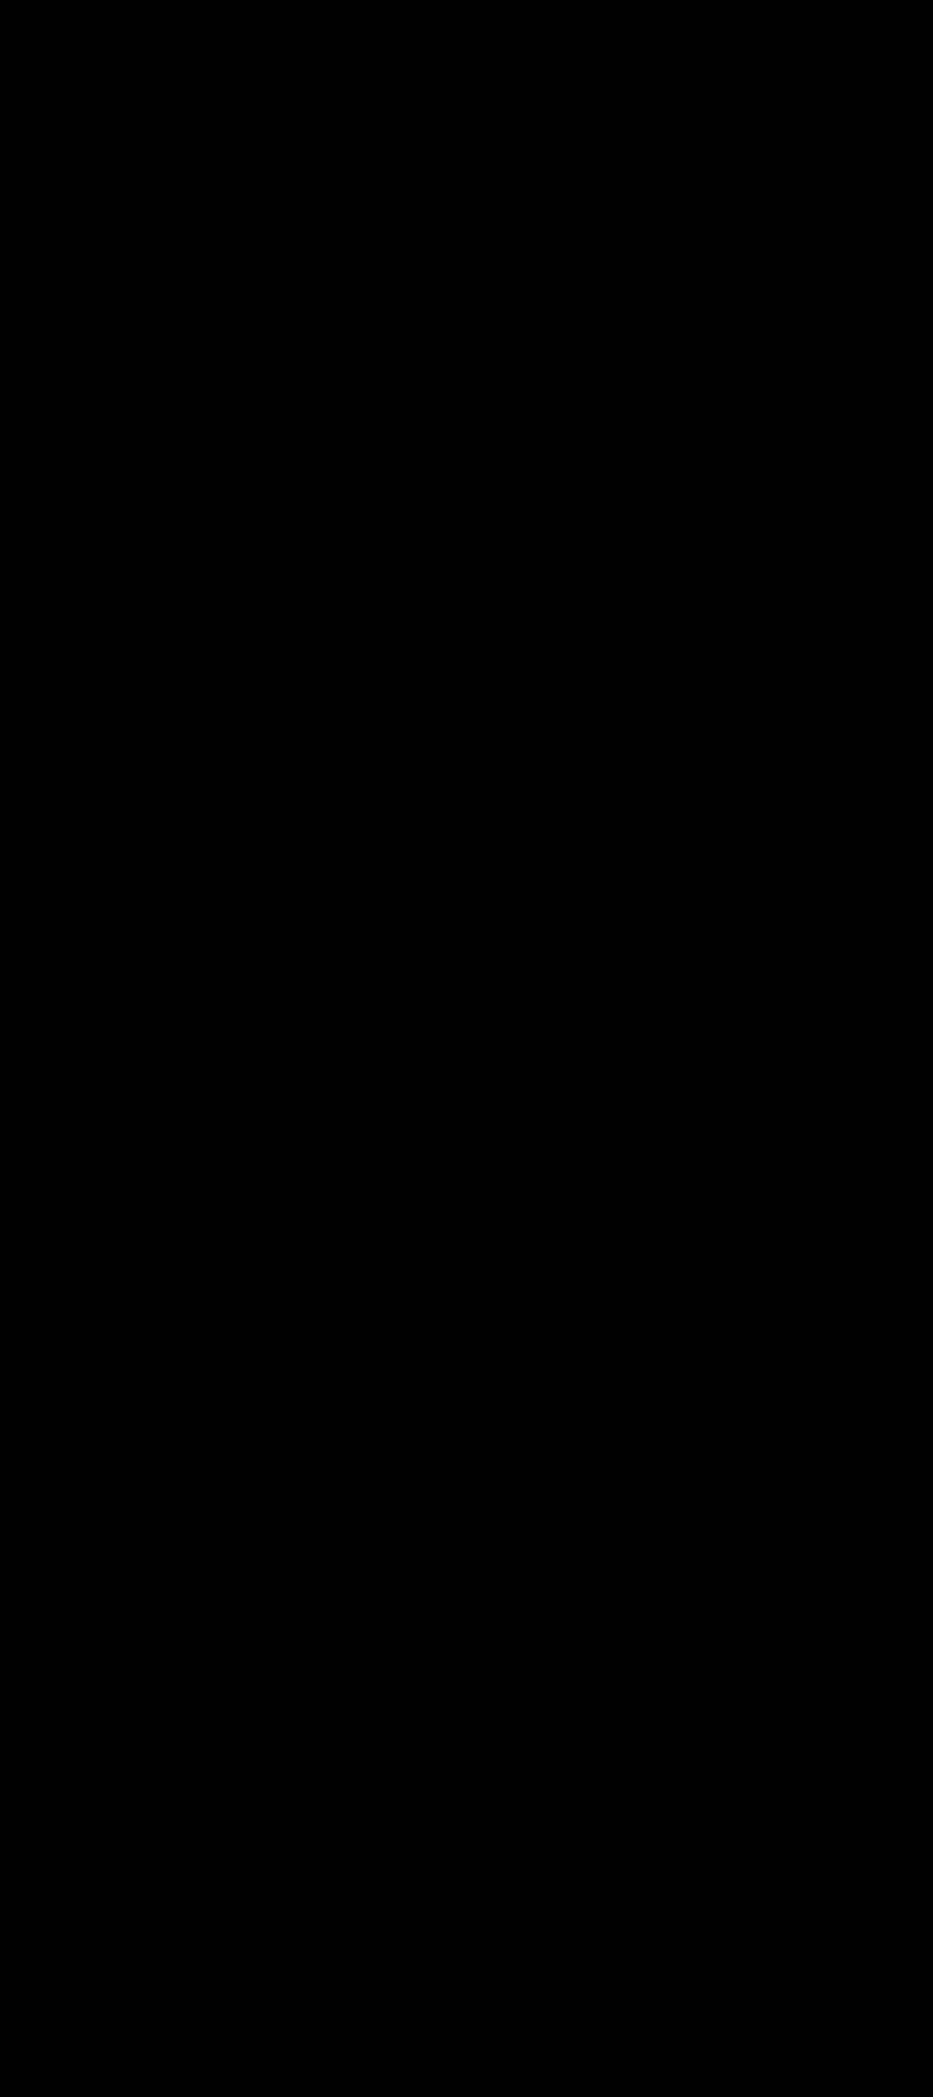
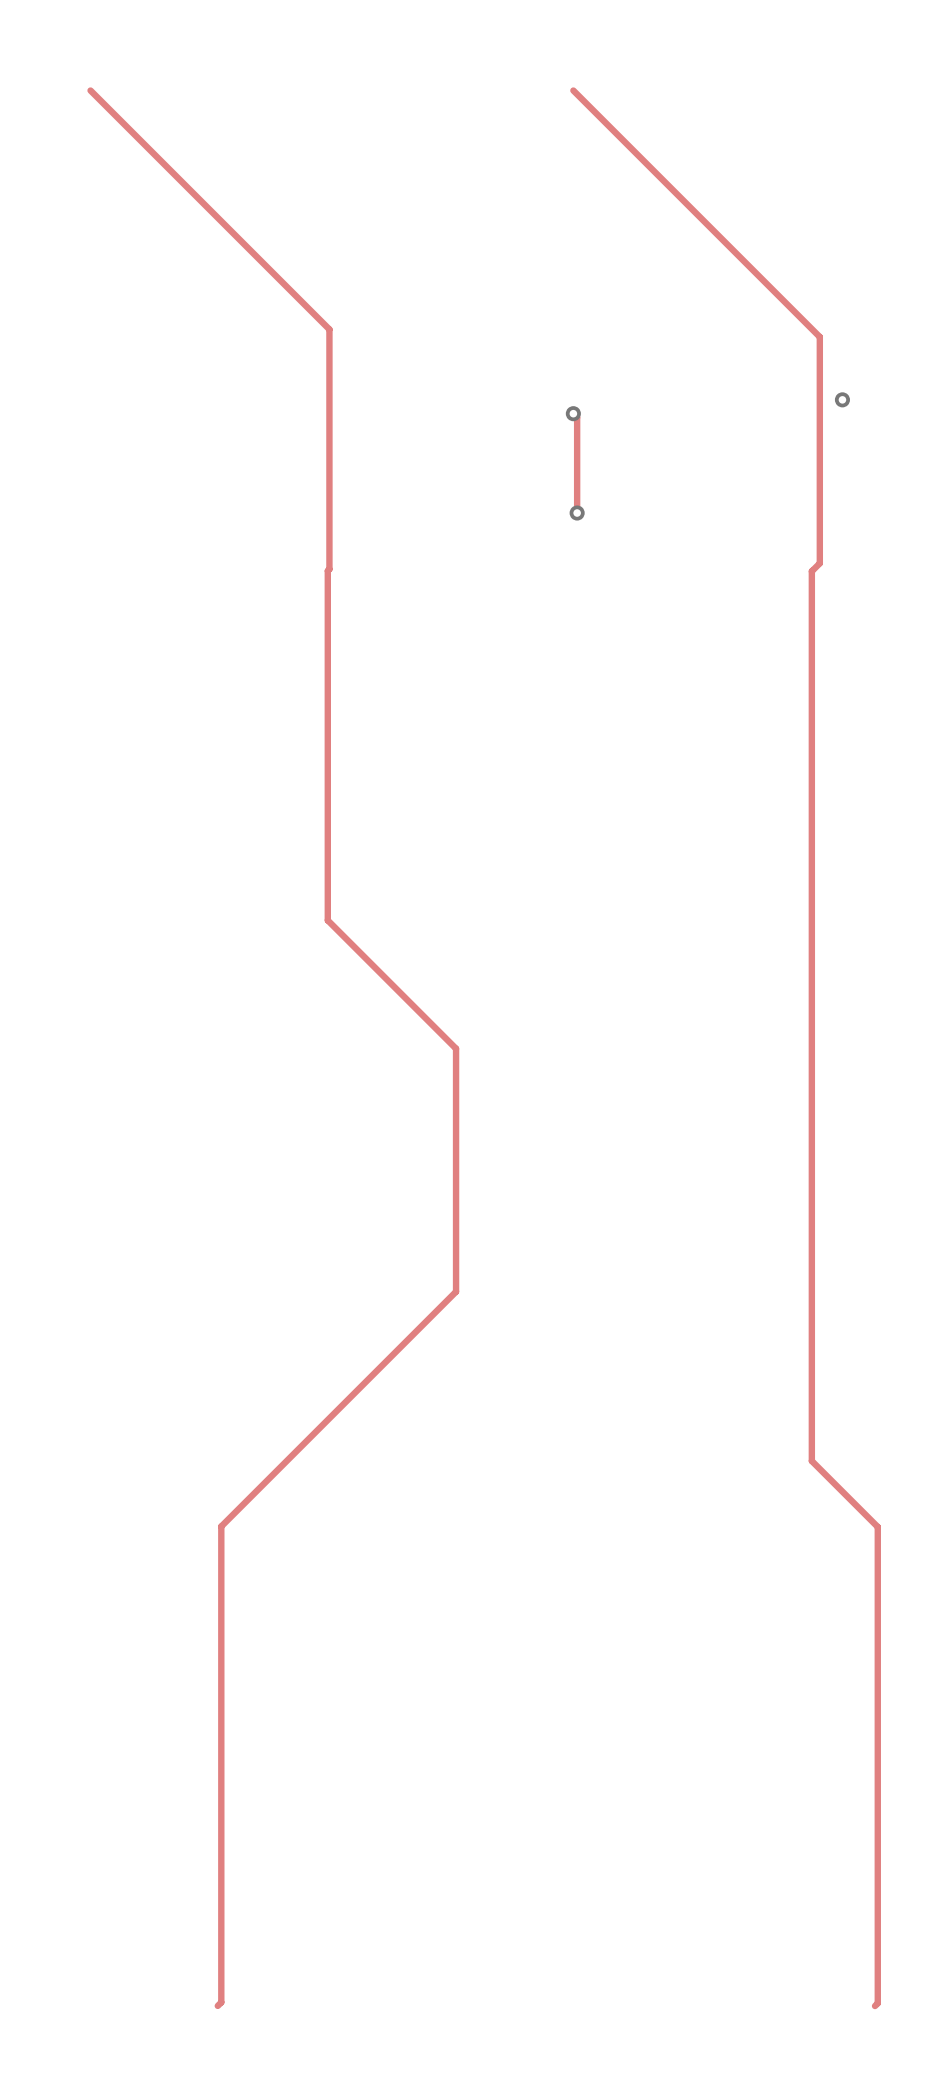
track: none -> (90, 90) (329, 329) (327, 920) (456, 1048) (456, 1291) (221, 1526) (221, 2002) (217, 2005)
track: none -> (573, 90) (819, 336) (819, 563) (811, 571) (811, 1461) (877, 1526) (877, 2003) (875, 2006)
via: none -> (842, 399)
track: none -> (573, 413) (577, 417) (577, 513)
via: none -> (573, 413)
via: none -> (577, 513)

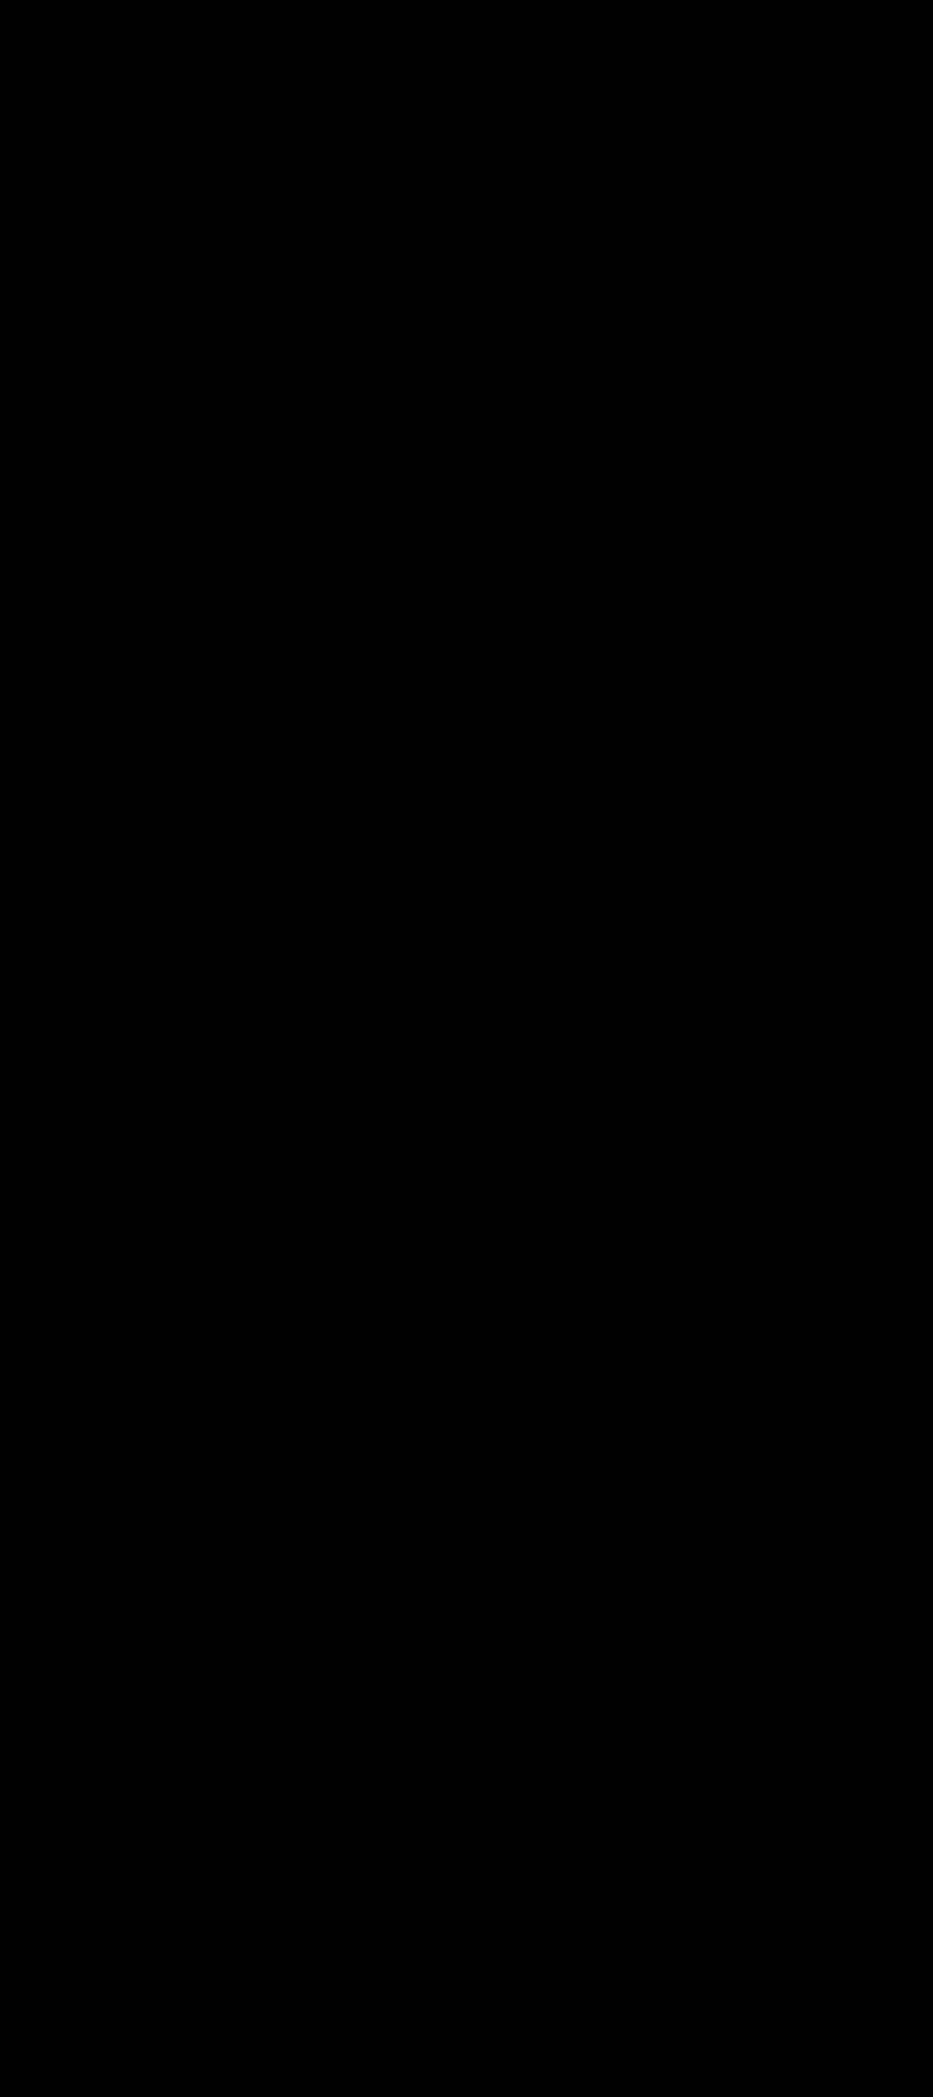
track: (90, 90) (329, 329) (327, 920) (456, 1048) (456, 1291) (221, 1526) (221, 2002) (217, 2005) -> none
track: (573, 90) (819, 336) (819, 563) (811, 571) (811, 1461) (877, 1526) (877, 2003) (875, 2006) -> none
via: (842, 399) -> none
track: (573, 413) (577, 417) (577, 513) -> none
via: (573, 413) -> none
via: (577, 513) -> none

